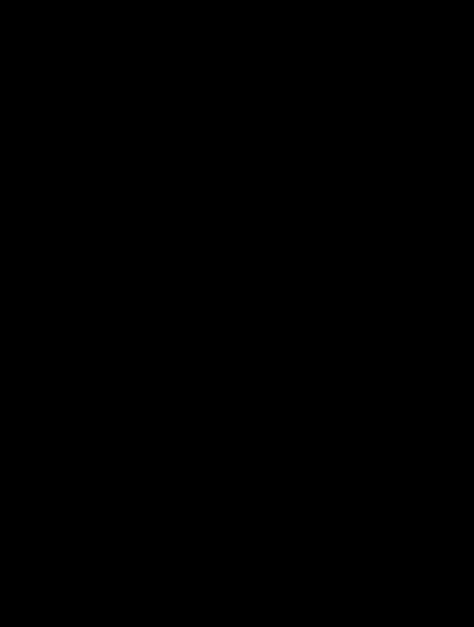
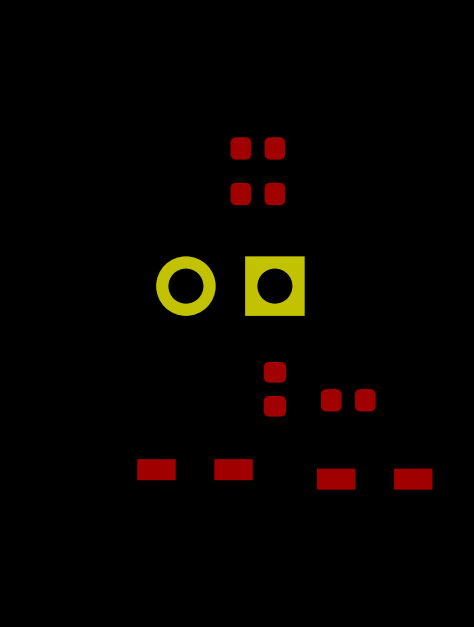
part: none -> (257, 148)
part: none -> (257, 193)
part: none -> (230, 286)
part: none -> (274, 389)
part: none -> (348, 400)
part: none -> (195, 469)
part: none -> (374, 479)

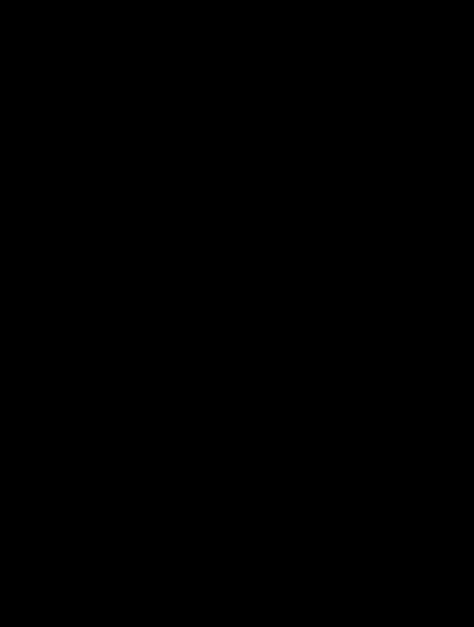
part: (257, 148) -> none
part: (257, 193) -> none
part: (230, 286) -> none
part: (274, 389) -> none
part: (348, 400) -> none
part: (195, 469) -> none
part: (374, 479) -> none

